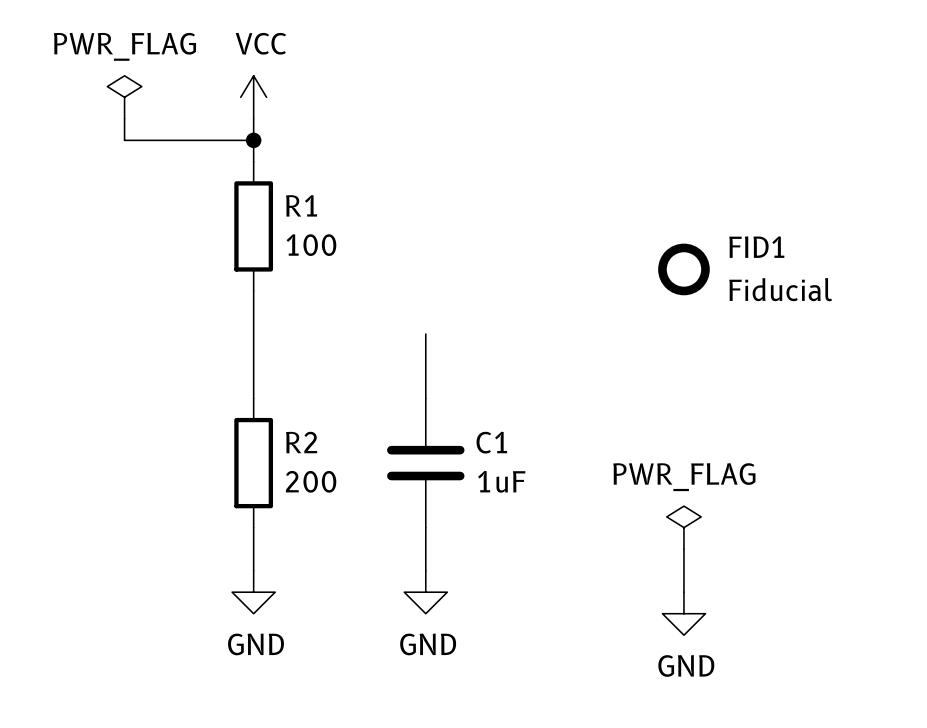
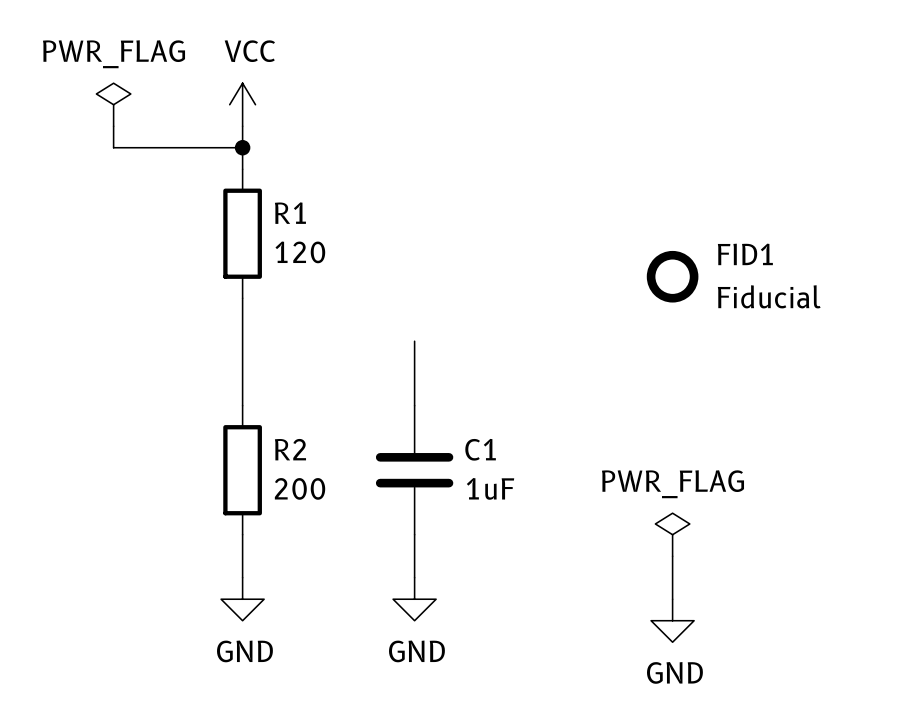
R1 value: 100 (311, 245) -> 120 (300, 252)

